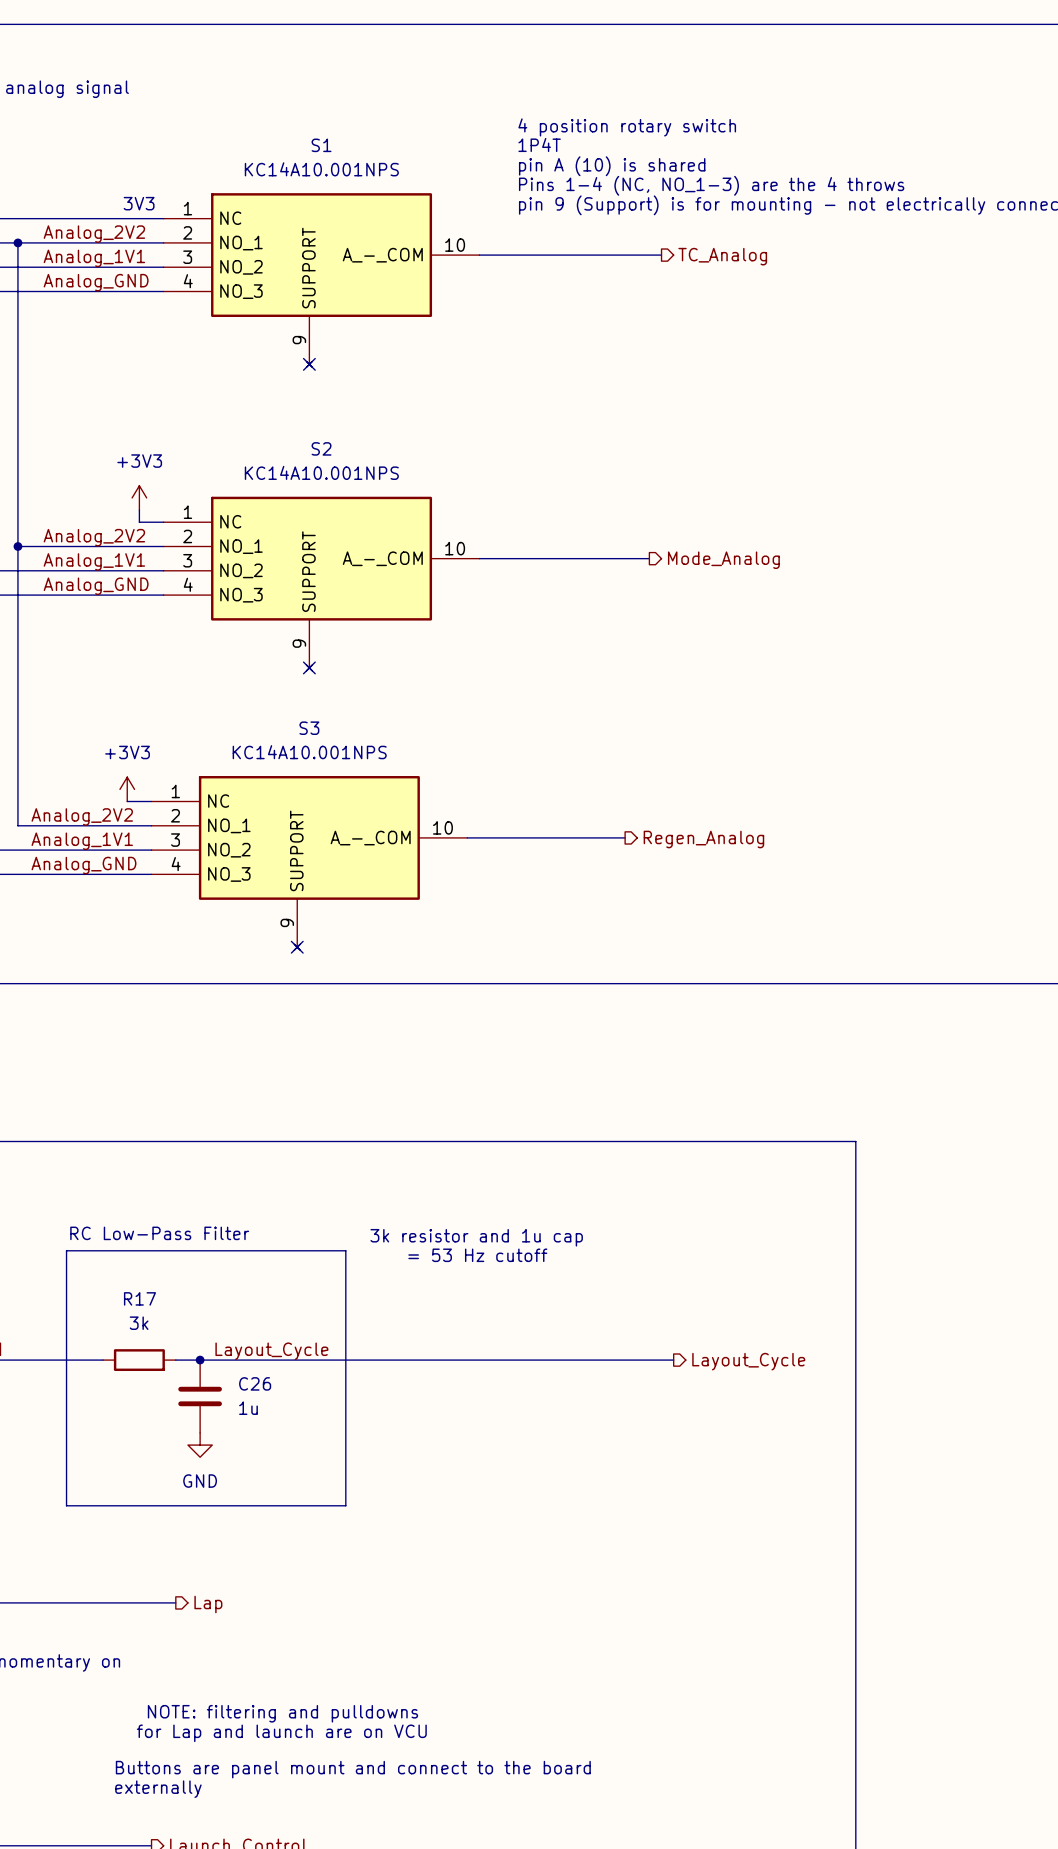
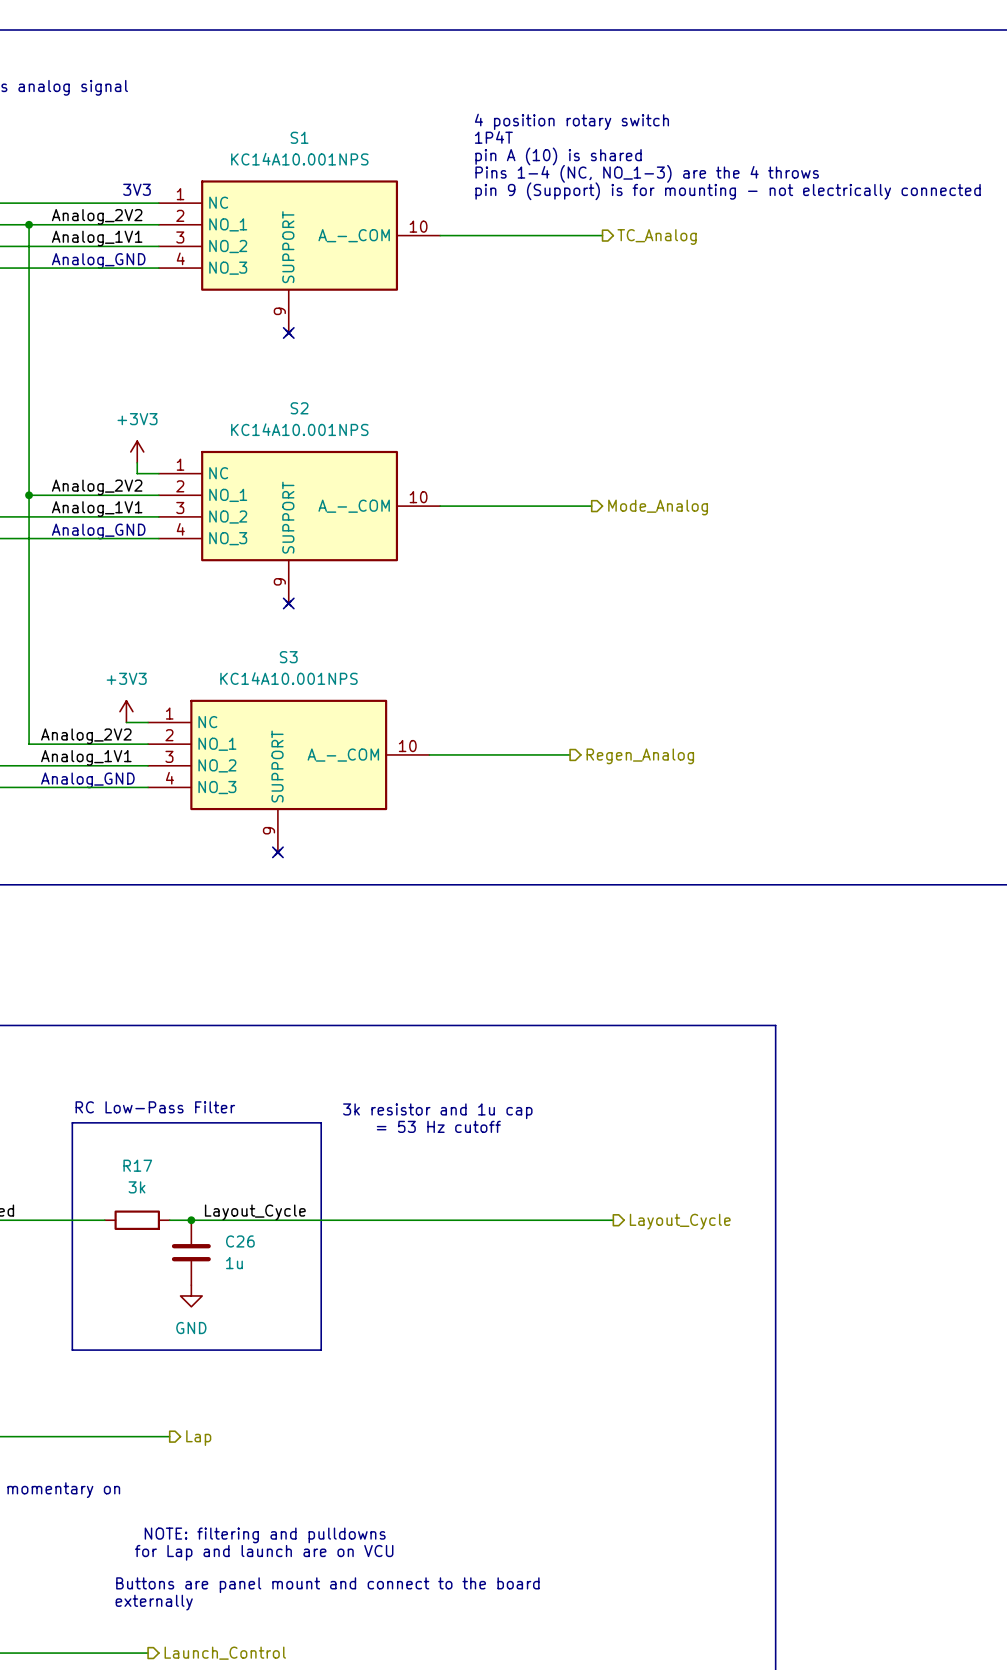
label: Analog_GND (96, 282) -> none
text: none -> Analog_GND (98, 260)
label: Analog_GND (96, 586) -> none
text: none -> Analog_GND (98, 531)
label: Analog_GND (83, 865) -> none
text: none -> Analog_GND (87, 780)

